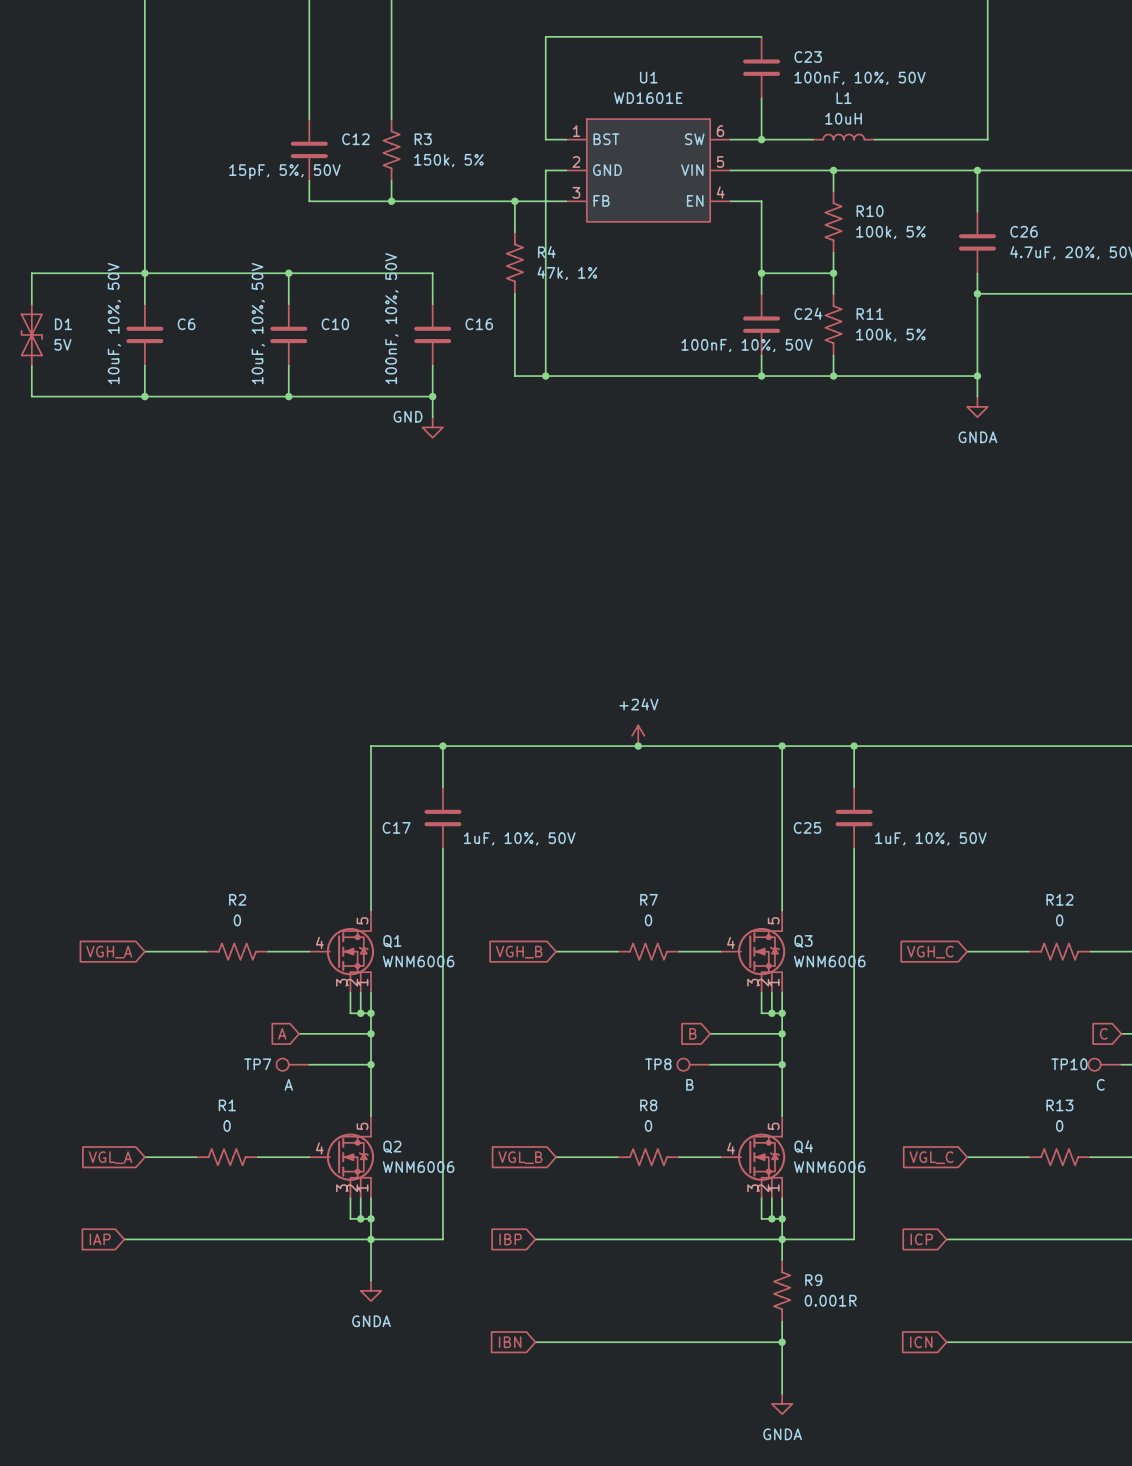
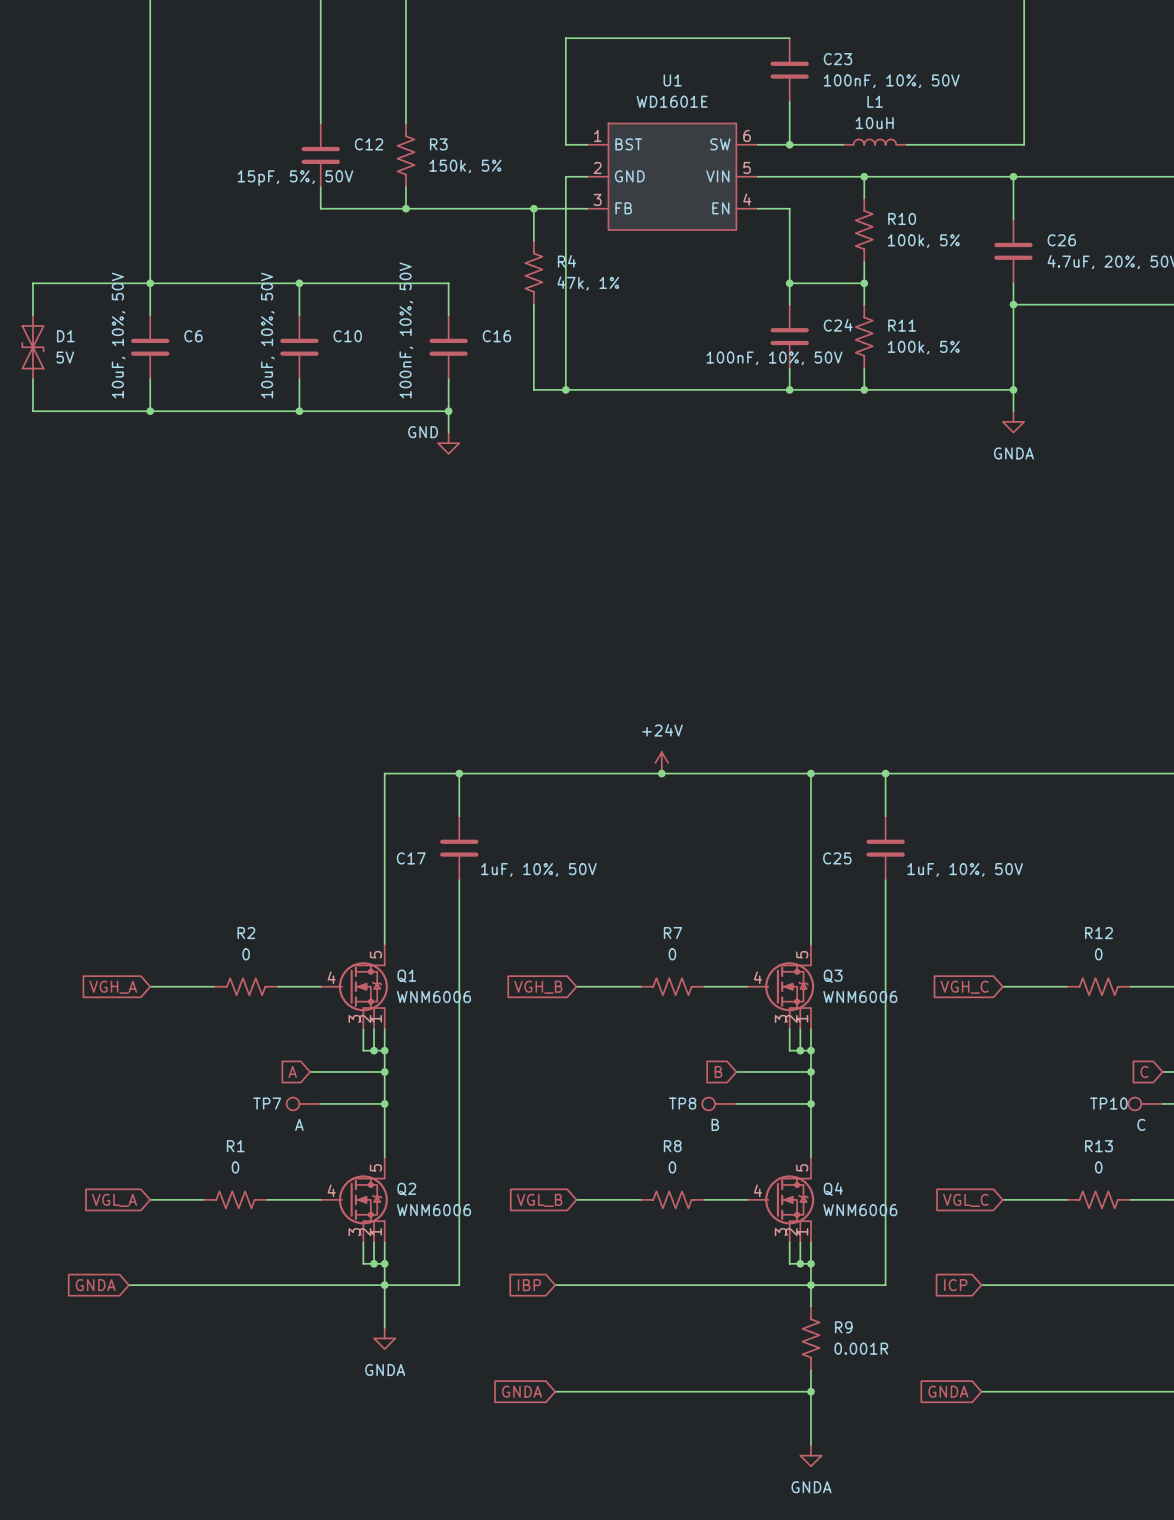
global label: IAP (100, 1239) -> GNDA (95, 1285)
global label: IBN (510, 1342) -> GNDA (522, 1391)
global label: ICN (921, 1342) -> GNDA (948, 1391)

